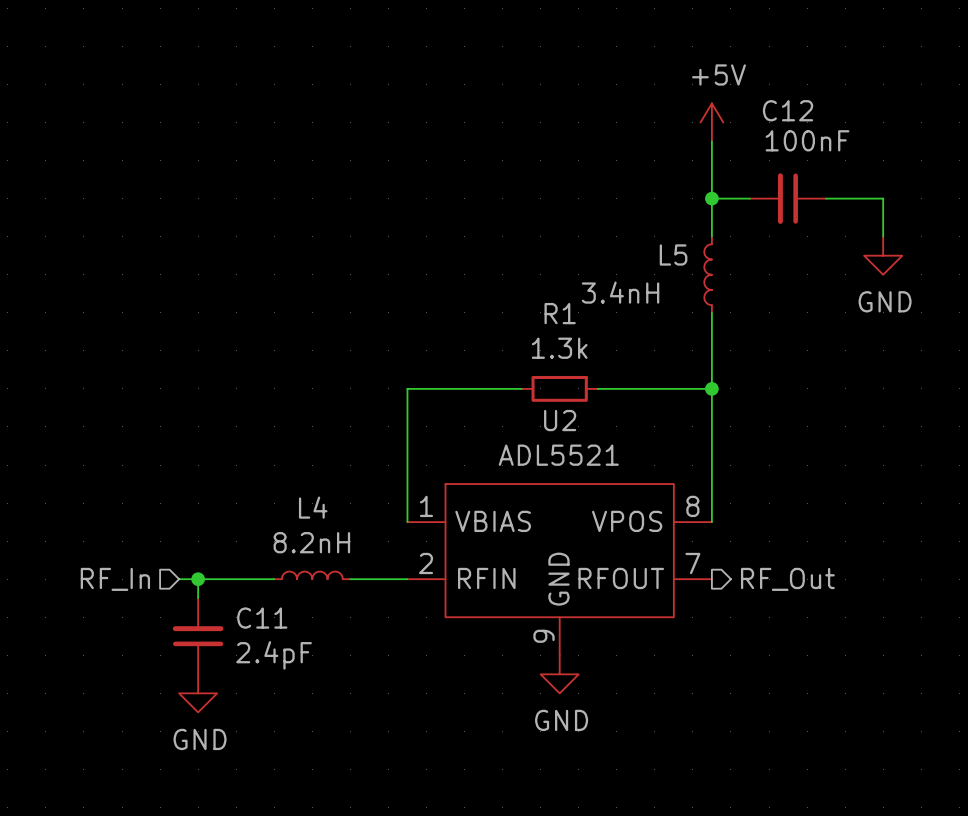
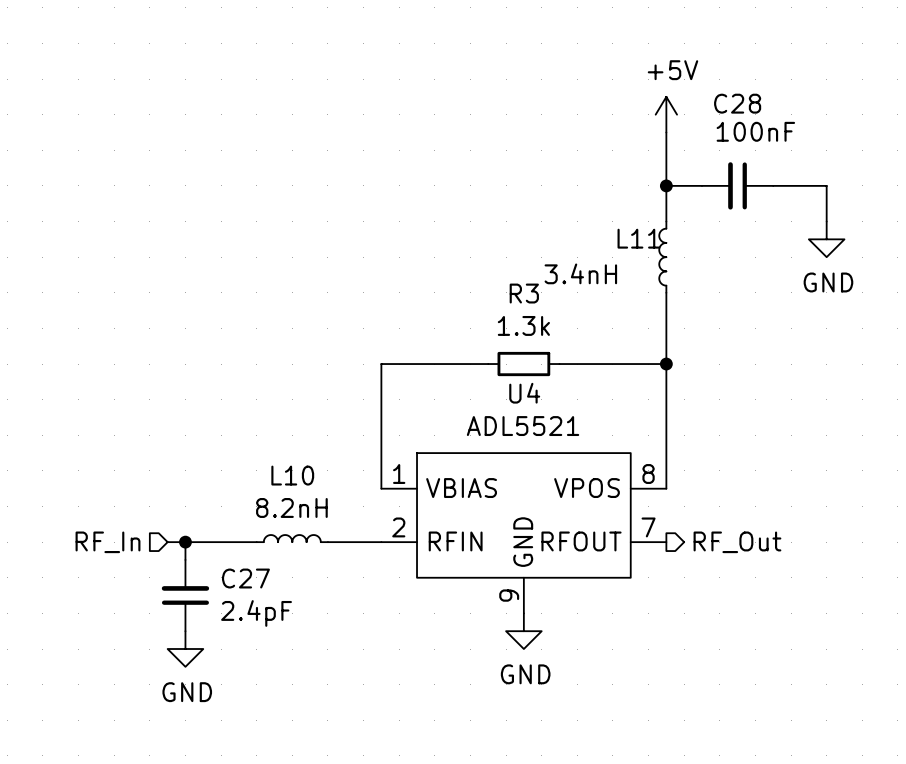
C12 name: C12 (788, 110) -> C28 (737, 103)
L5 name: L5 (673, 254) -> L11 (638, 238)
R1 name: R1 (560, 313) -> R3 (524, 293)
U2 name: U2 (560, 420) -> U4 (524, 393)
L4 name: L4 (313, 507) -> L10 (292, 475)
C11 name: C11 (262, 618) -> C27 (245, 578)

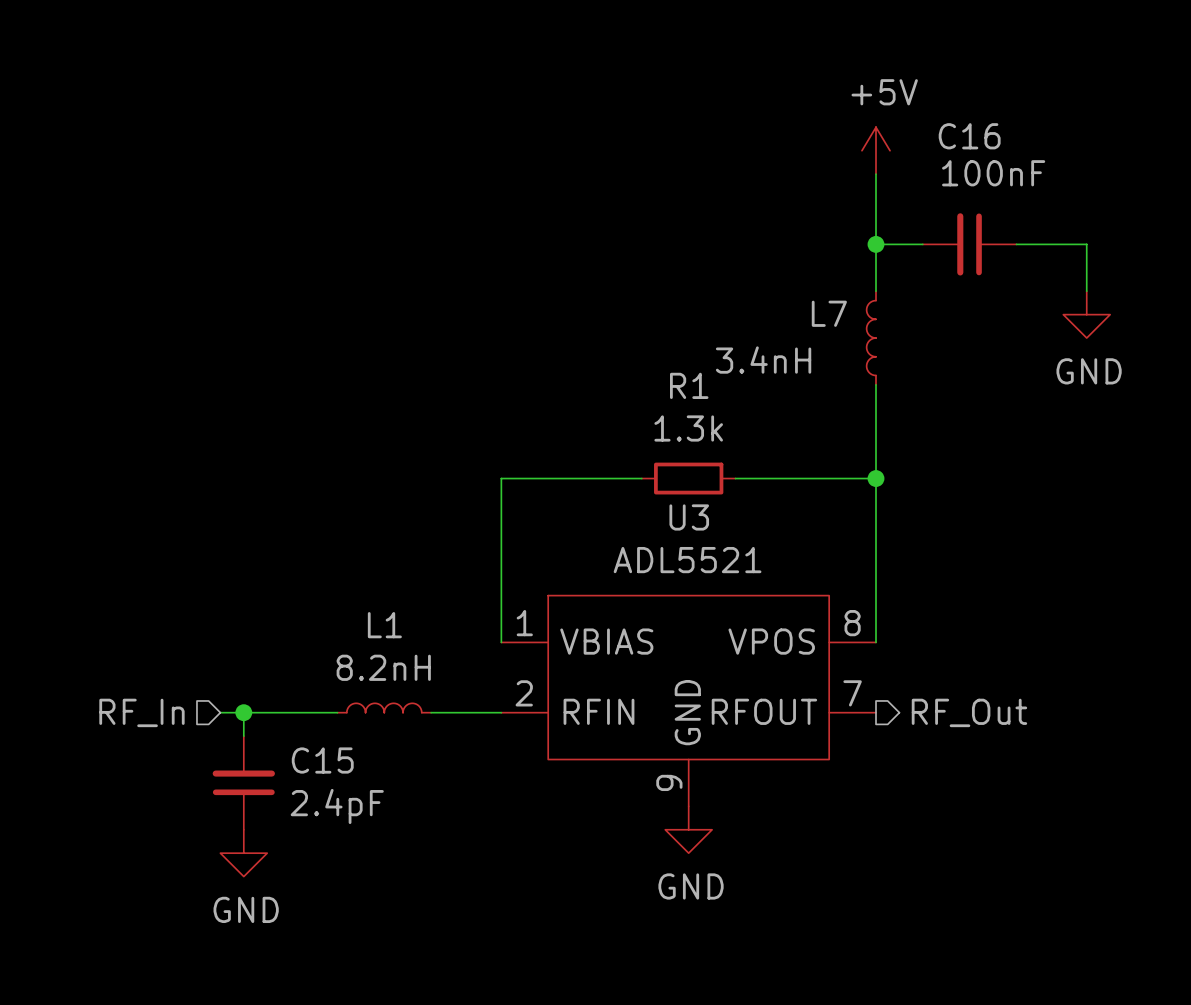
C28 name: C28 (737, 103) -> C16 (969, 136)
L11 name: L11 (638, 238) -> L7 (829, 313)
R3 name: R3 (524, 293) -> R1 (689, 385)
U4 name: U4 (524, 393) -> U3 (689, 517)
L10 name: L10 (292, 475) -> L1 (384, 625)
C27 name: C27 (245, 578) -> C15 (322, 760)

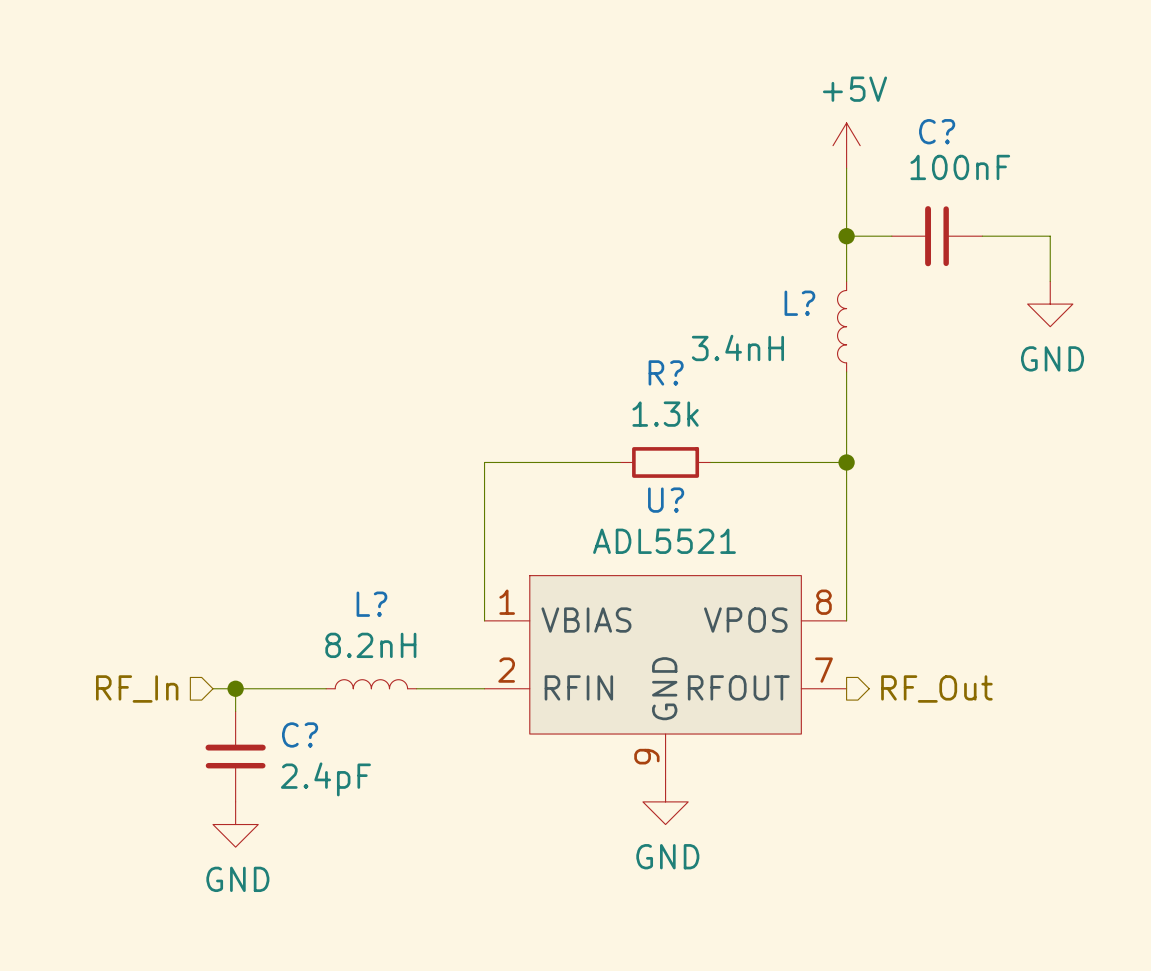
C16 name: C16 (969, 136) -> C? (937, 131)
L7 name: L7 (829, 313) -> L? (799, 303)
R1 name: R1 (689, 385) -> R? (666, 372)
U3 name: U3 (689, 517) -> U? (666, 500)
L1 name: L1 (384, 625) -> L? (371, 604)
C15 name: C15 (322, 760) -> C? (300, 734)

